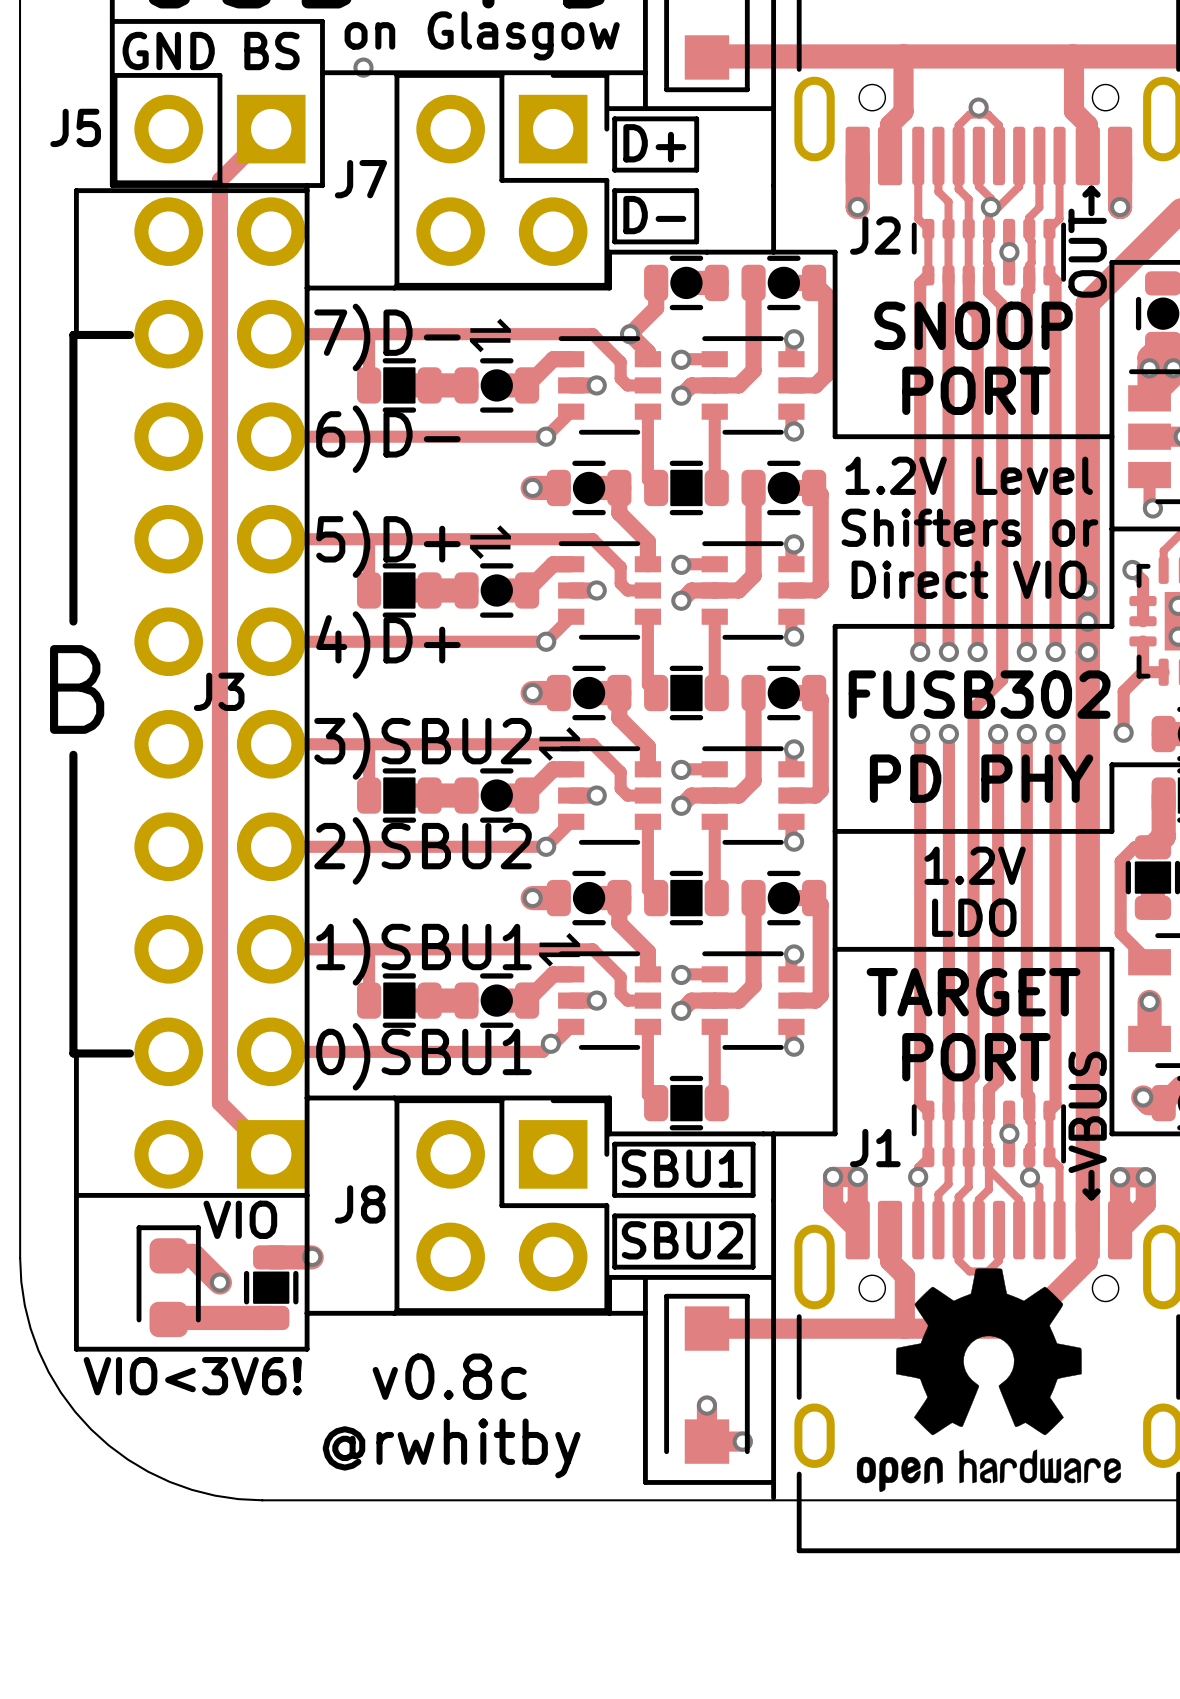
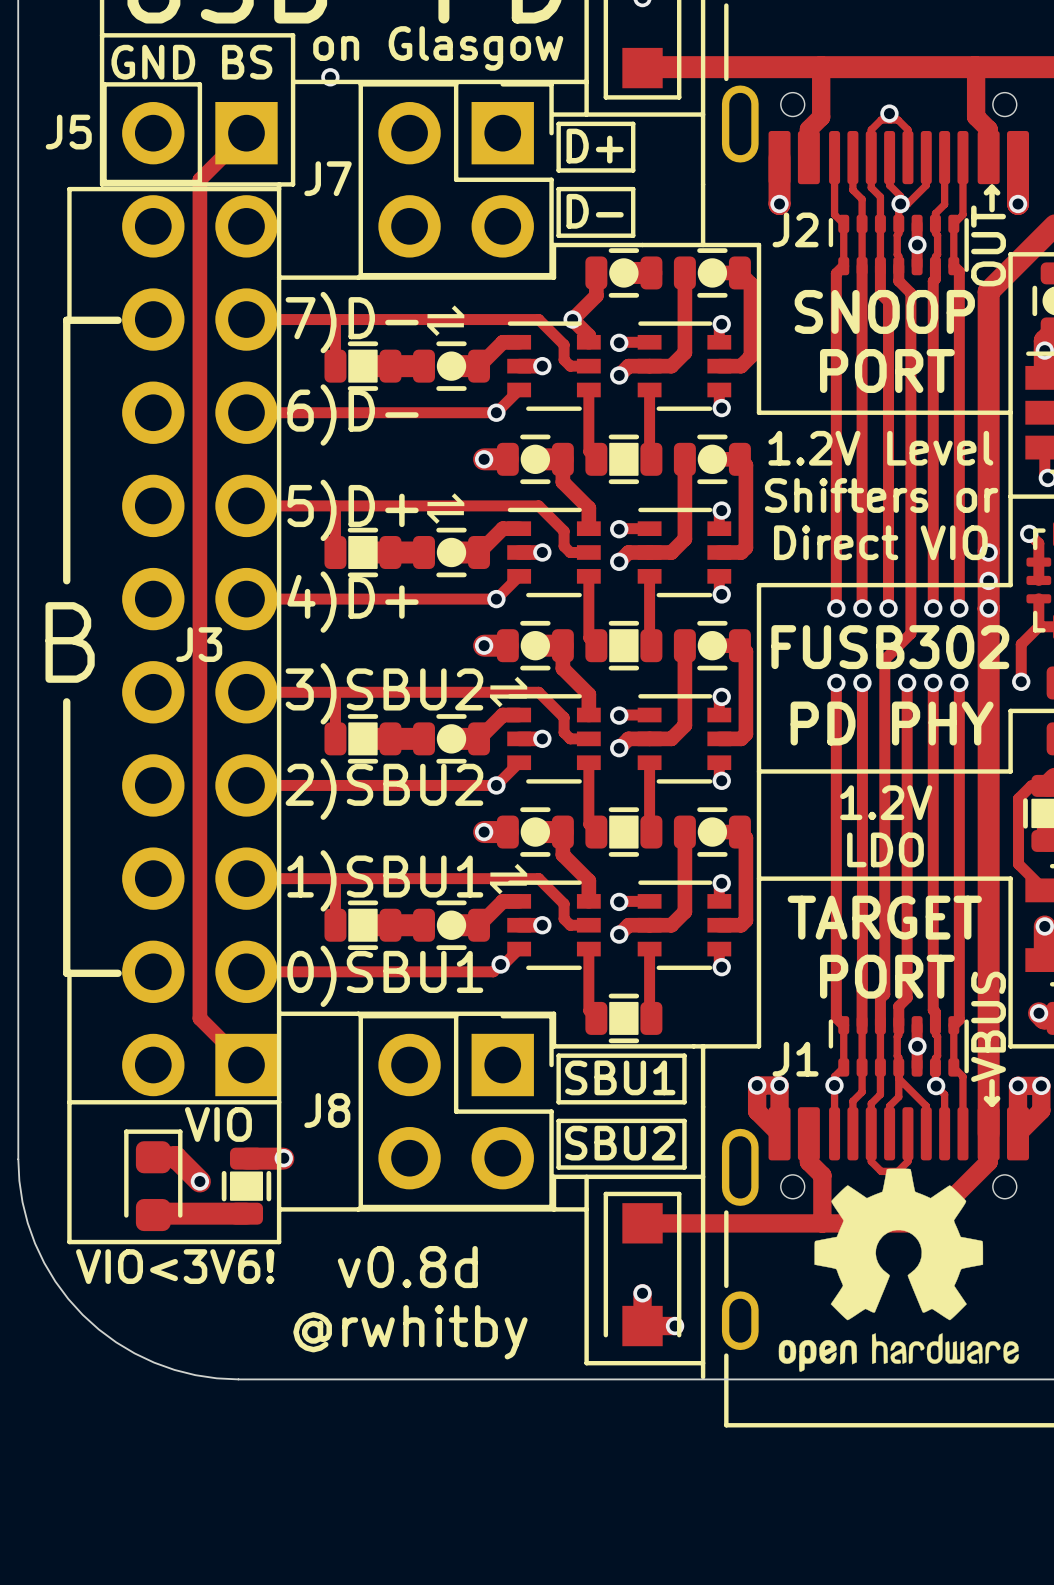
text: v0.8c (449, 1376) -> v0.8d (407, 1267)

